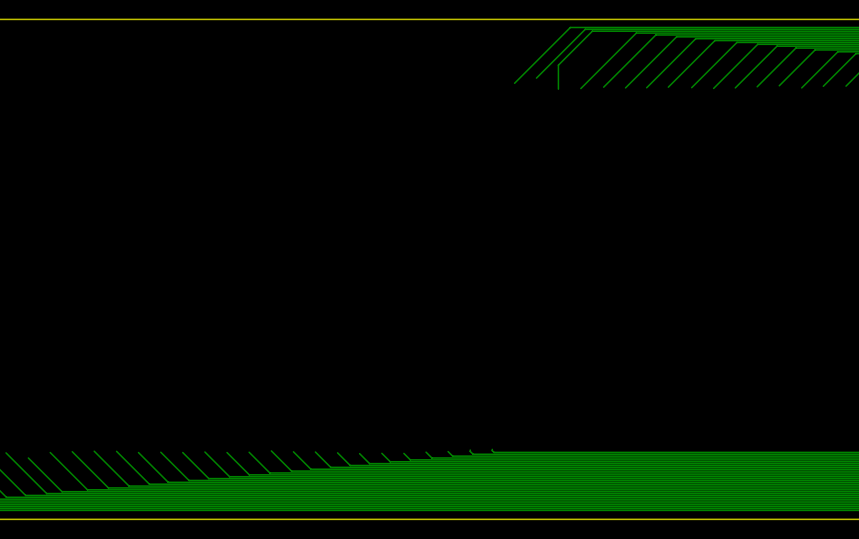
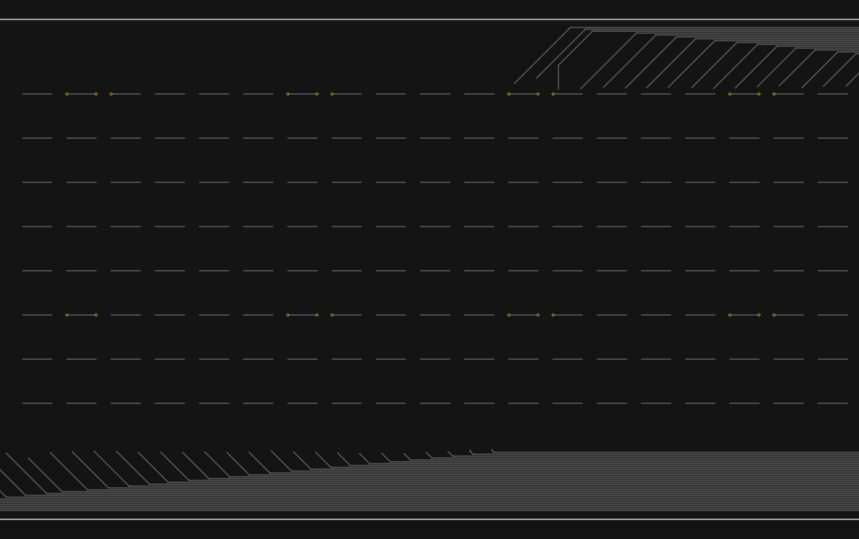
track: none -> (51, 93) (22, 93)
track: none -> (96, 93) (66, 93)
via: none -> (96, 93)
track: none -> (140, 93) (111, 93)
track: none -> (184, 93) (155, 93)
track: none -> (228, 93) (199, 93)
track: none -> (272, 93) (243, 93)
track: none -> (317, 93) (287, 93)
via: none -> (317, 93)
track: none -> (361, 93) (332, 93)
track: none -> (405, 93) (376, 93)
track: none -> (449, 93) (420, 93)
track: none -> (493, 93) (464, 93)
track: none -> (538, 93) (508, 93)
via: none -> (538, 93)
track: none -> (582, 93) (553, 93)
track: none -> (626, 93) (597, 93)
track: none -> (670, 93) (641, 93)
track: none -> (714, 93) (685, 93)
track: none -> (759, 93) (729, 93)
via: none -> (759, 93)
track: none -> (803, 93) (774, 93)
track: none -> (847, 93) (818, 93)
via: none -> (66, 94)
via: none -> (111, 94)
via: none -> (287, 94)
via: none -> (332, 94)
via: none -> (508, 94)
via: none -> (553, 94)
via: none -> (729, 94)
via: none -> (774, 94)
track: none -> (51, 138) (22, 138)
track: none -> (96, 138) (66, 138)
track: none -> (140, 138) (111, 138)
track: none -> (184, 138) (155, 138)
track: none -> (228, 138) (199, 138)
track: none -> (272, 138) (243, 138)
track: none -> (317, 138) (287, 138)
track: none -> (361, 138) (332, 138)
track: none -> (405, 138) (376, 138)
track: none -> (449, 138) (420, 138)
track: none -> (493, 138) (464, 138)
track: none -> (538, 138) (508, 138)
track: none -> (582, 138) (553, 138)
track: none -> (626, 138) (597, 138)
track: none -> (670, 138) (641, 138)
track: none -> (714, 138) (685, 138)
track: none -> (759, 138) (729, 138)
track: none -> (803, 138) (774, 138)
track: none -> (847, 138) (818, 138)
track: none -> (51, 182) (22, 182)
track: none -> (96, 182) (66, 182)
track: none -> (140, 182) (111, 182)
track: none -> (184, 182) (155, 182)
track: none -> (228, 182) (199, 182)
track: none -> (272, 182) (243, 182)
track: none -> (317, 182) (287, 182)
track: none -> (361, 182) (332, 182)
track: none -> (405, 182) (376, 182)
track: none -> (449, 182) (420, 182)
track: none -> (493, 182) (464, 182)
track: none -> (538, 182) (508, 182)
track: none -> (582, 182) (553, 182)
track: none -> (626, 182) (597, 182)
track: none -> (670, 182) (641, 182)
track: none -> (714, 182) (685, 182)
track: none -> (759, 182) (729, 182)
track: none -> (803, 182) (774, 182)
track: none -> (847, 182) (818, 182)
track: none -> (51, 226) (22, 226)
track: none -> (96, 226) (66, 226)
track: none -> (140, 226) (111, 226)
track: none -> (184, 226) (155, 226)
track: none -> (228, 226) (199, 226)
track: none -> (272, 226) (243, 226)
track: none -> (317, 226) (287, 226)
track: none -> (361, 226) (332, 226)
track: none -> (405, 226) (376, 226)
track: none -> (449, 226) (420, 226)
track: none -> (493, 226) (464, 226)
track: none -> (538, 226) (508, 226)
track: none -> (582, 226) (553, 226)
track: none -> (626, 226) (597, 226)
track: none -> (670, 226) (641, 226)
track: none -> (714, 226) (685, 226)
track: none -> (759, 226) (729, 226)
track: none -> (803, 226) (774, 226)
track: none -> (847, 226) (818, 226)
track: none -> (51, 270) (22, 270)
track: none -> (96, 270) (66, 270)
track: none -> (140, 270) (111, 270)
track: none -> (184, 270) (155, 270)
track: none -> (228, 270) (199, 270)
track: none -> (272, 270) (243, 270)
track: none -> (317, 270) (287, 270)
track: none -> (361, 270) (332, 270)
track: none -> (405, 270) (376, 270)
track: none -> (449, 270) (420, 270)
track: none -> (493, 270) (464, 270)
track: none -> (538, 270) (508, 270)
track: none -> (582, 270) (553, 270)
track: none -> (626, 270) (597, 270)
track: none -> (670, 270) (641, 270)
track: none -> (714, 270) (685, 270)
track: none -> (759, 270) (729, 270)
track: none -> (803, 270) (774, 270)
track: none -> (847, 270) (818, 270)
track: none -> (51, 314) (22, 314)
track: none -> (96, 314) (66, 314)
via: none -> (96, 314)
track: none -> (140, 314) (111, 314)
track: none -> (184, 314) (155, 314)
track: none -> (228, 314) (199, 314)
track: none -> (272, 314) (243, 314)
track: none -> (317, 314) (287, 314)
via: none -> (317, 314)
track: none -> (361, 314) (332, 314)
track: none -> (405, 314) (376, 314)
track: none -> (449, 314) (420, 314)
track: none -> (493, 314) (464, 314)
track: none -> (538, 314) (508, 314)
via: none -> (538, 314)
track: none -> (582, 314) (553, 314)
track: none -> (626, 314) (597, 314)
track: none -> (670, 314) (641, 314)
track: none -> (714, 314) (685, 314)
track: none -> (759, 314) (729, 314)
via: none -> (759, 314)
track: none -> (803, 314) (774, 314)
track: none -> (847, 314) (818, 314)
via: none -> (66, 315)
via: none -> (287, 315)
via: none -> (332, 315)
via: none -> (508, 315)
via: none -> (553, 315)
via: none -> (729, 315)
via: none -> (774, 315)
track: none -> (51, 359) (22, 359)
track: none -> (96, 359) (66, 359)
track: none -> (140, 359) (111, 359)
track: none -> (184, 359) (155, 359)
track: none -> (228, 359) (199, 359)
track: none -> (272, 359) (243, 359)
track: none -> (317, 359) (287, 359)
track: none -> (361, 359) (332, 359)
track: none -> (405, 359) (376, 359)
track: none -> (449, 359) (420, 359)
track: none -> (493, 359) (464, 359)
track: none -> (538, 359) (508, 359)
track: none -> (582, 359) (553, 359)
track: none -> (626, 359) (597, 359)
track: none -> (670, 359) (641, 359)
track: none -> (714, 359) (685, 359)
track: none -> (759, 359) (729, 359)
track: none -> (803, 359) (774, 359)
track: none -> (847, 359) (818, 359)
track: none -> (51, 403) (22, 403)
track: none -> (96, 403) (66, 403)
track: none -> (140, 403) (111, 403)
track: none -> (184, 403) (155, 403)
track: none -> (228, 403) (199, 403)
track: none -> (272, 403) (243, 403)
track: none -> (317, 403) (287, 403)
track: none -> (361, 403) (332, 403)
track: none -> (405, 403) (376, 403)
track: none -> (449, 403) (420, 403)
track: none -> (493, 403) (464, 403)
track: none -> (538, 403) (508, 403)
track: none -> (582, 403) (553, 403)
track: none -> (626, 403) (597, 403)
track: none -> (670, 403) (641, 403)
track: none -> (714, 403) (685, 403)
track: none -> (759, 403) (729, 403)
track: none -> (803, 403) (774, 403)
track: none -> (847, 403) (818, 403)

